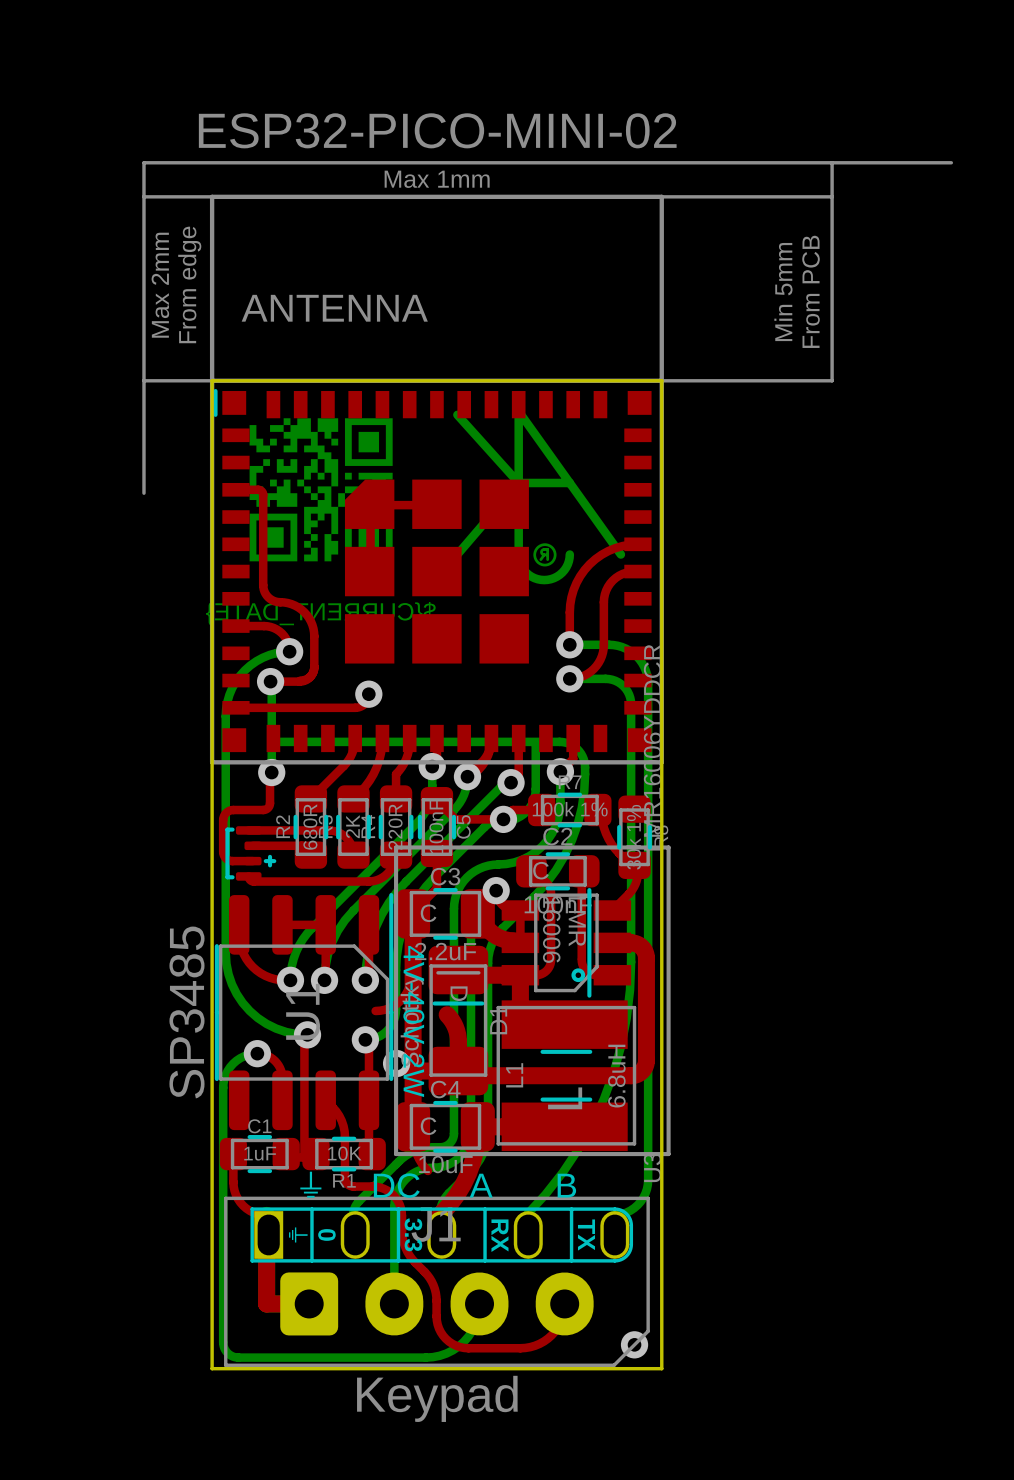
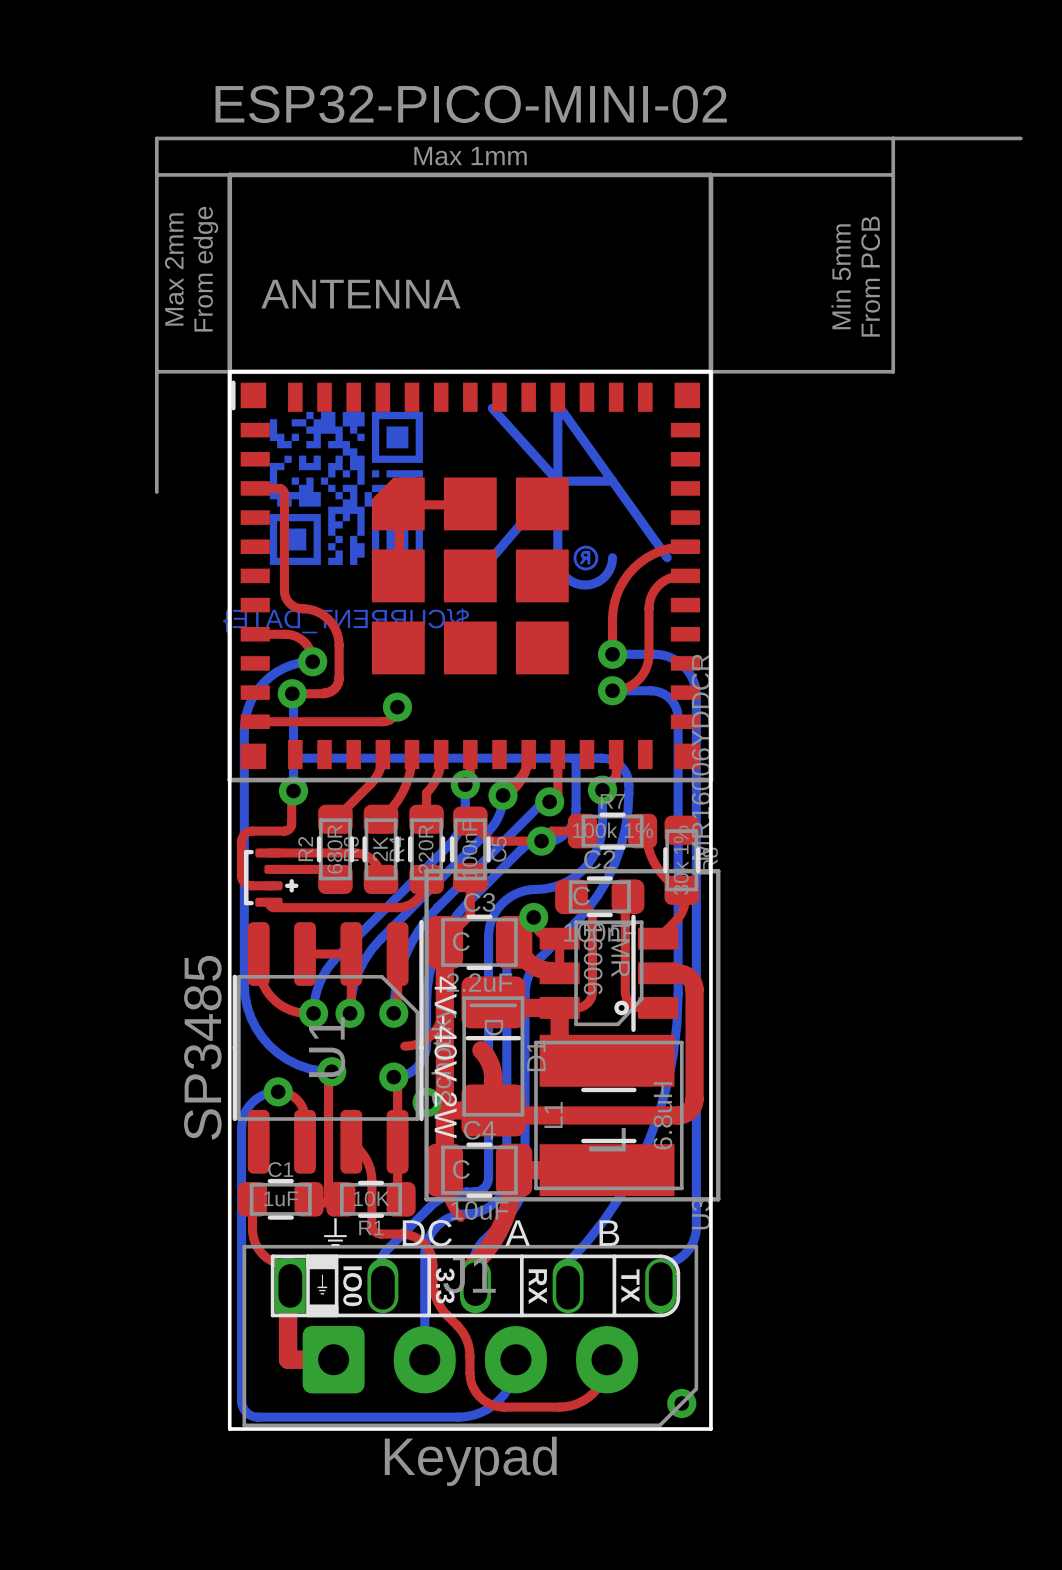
part footprint: [250, 1207, 634, 1263] -> [270, 1254, 681, 1318]

